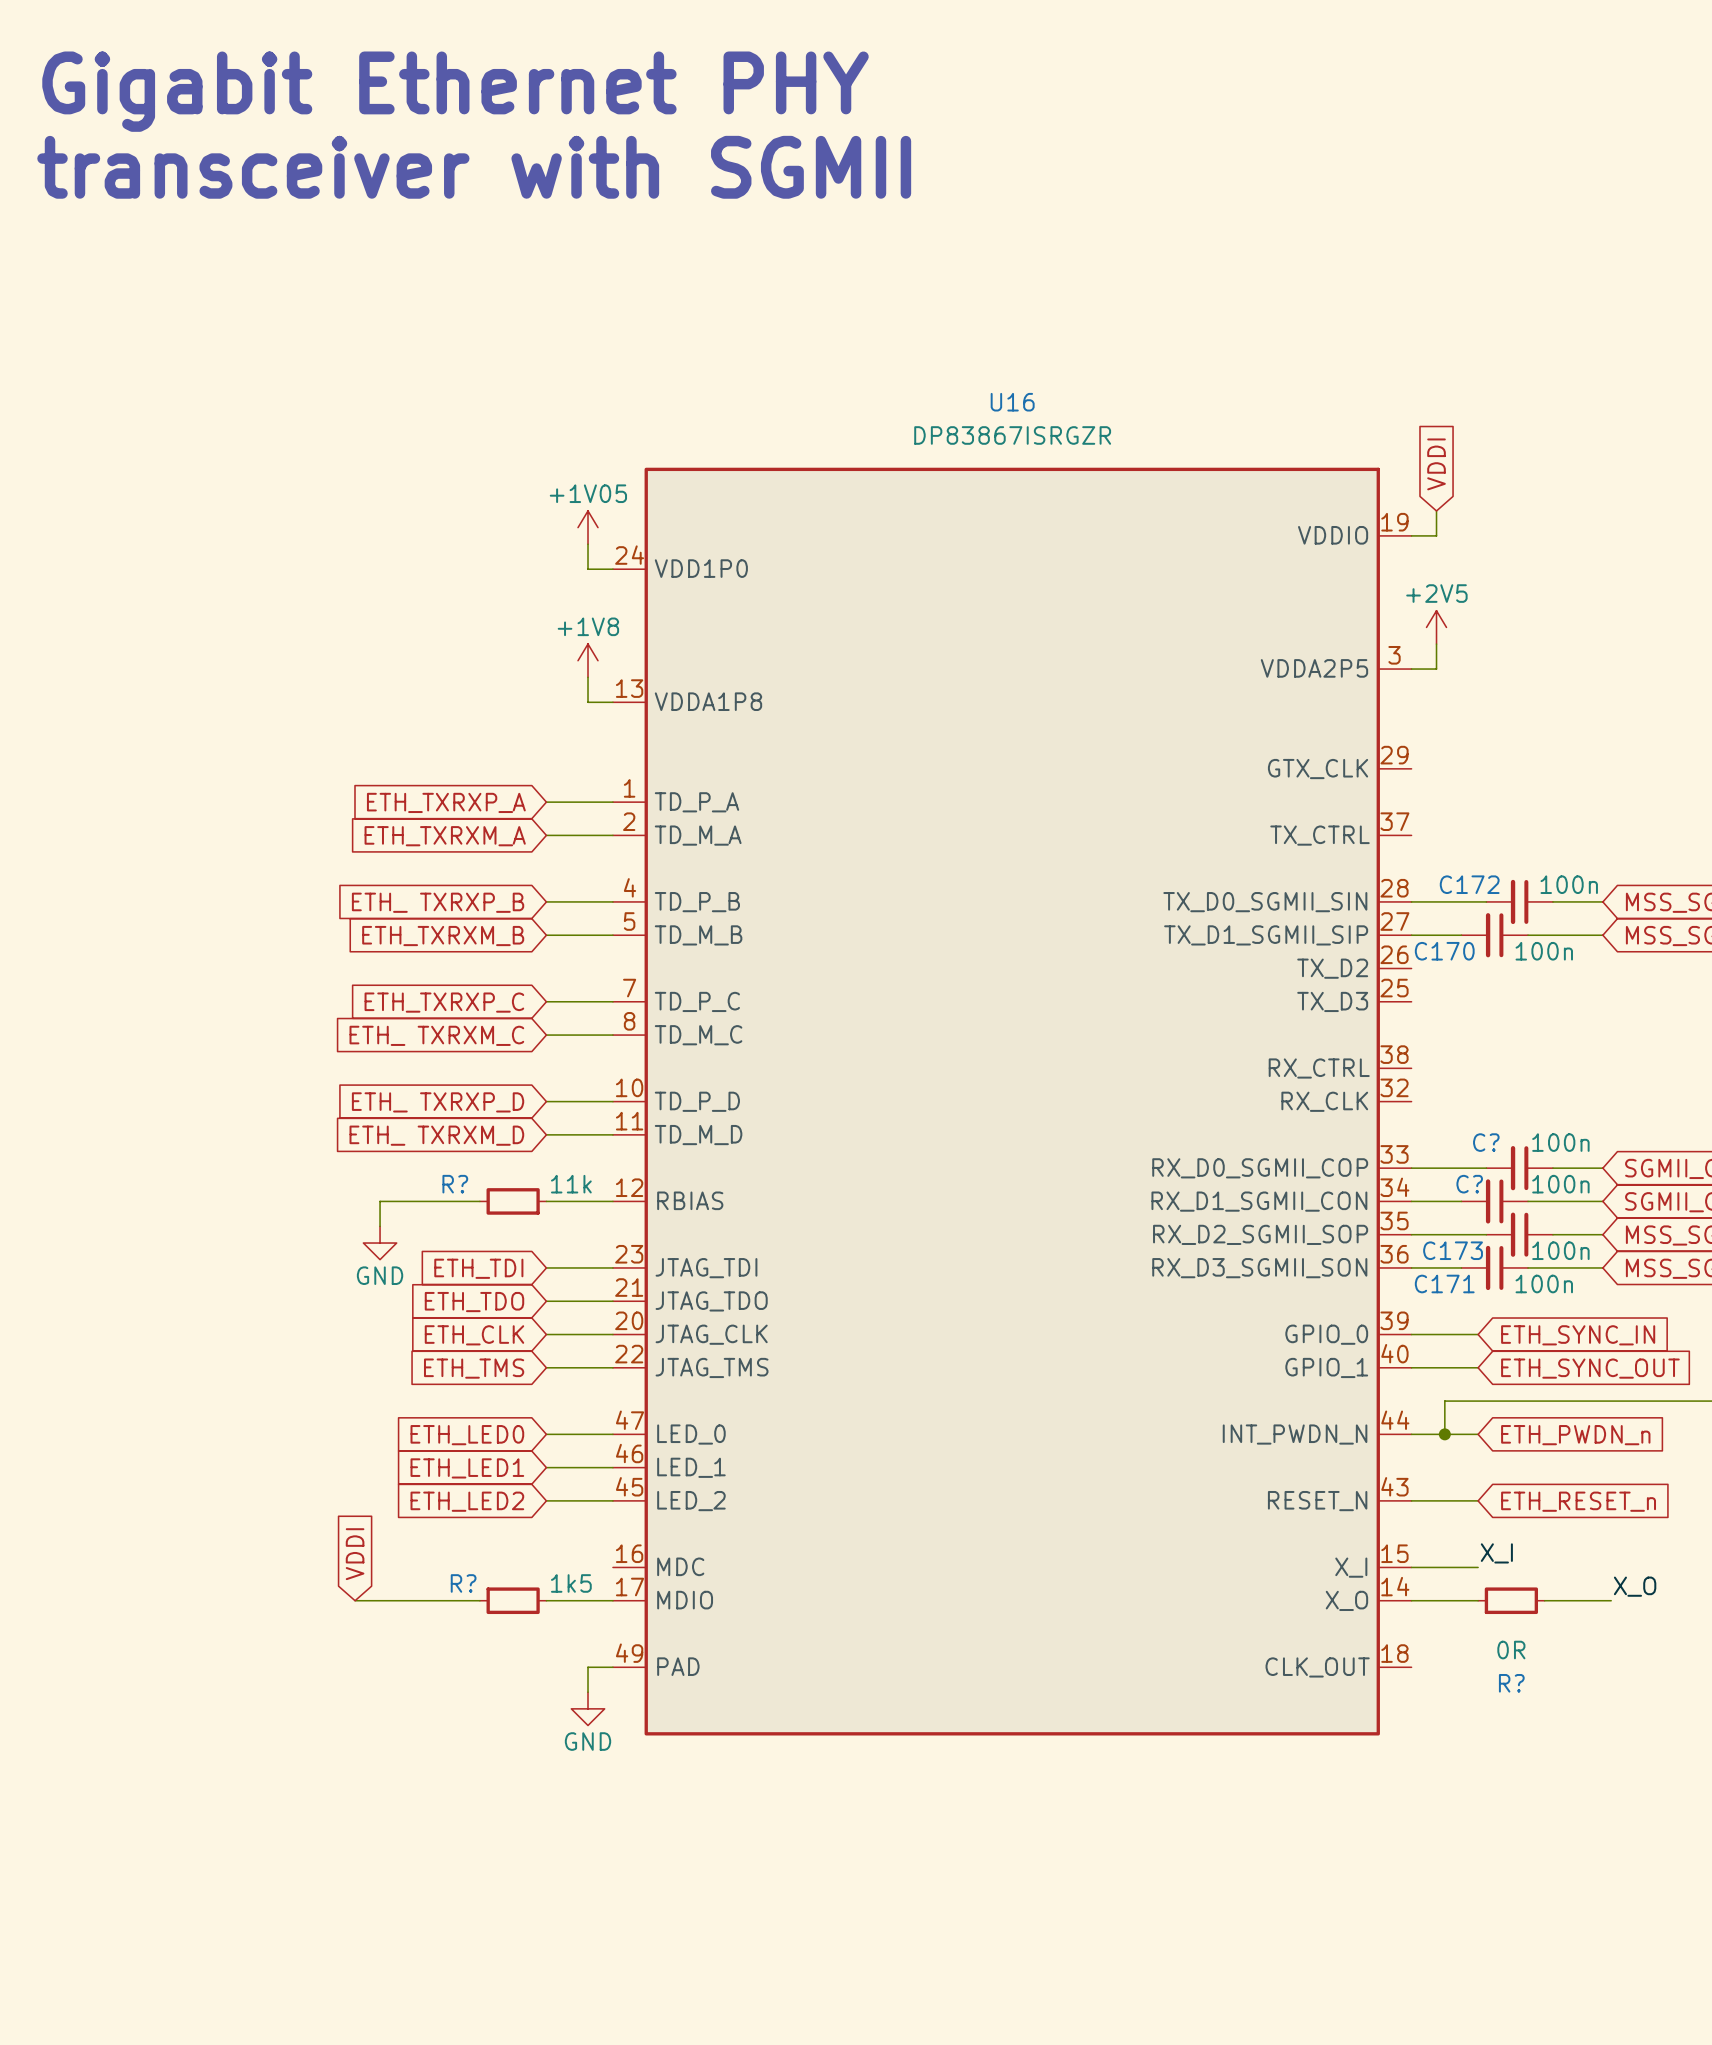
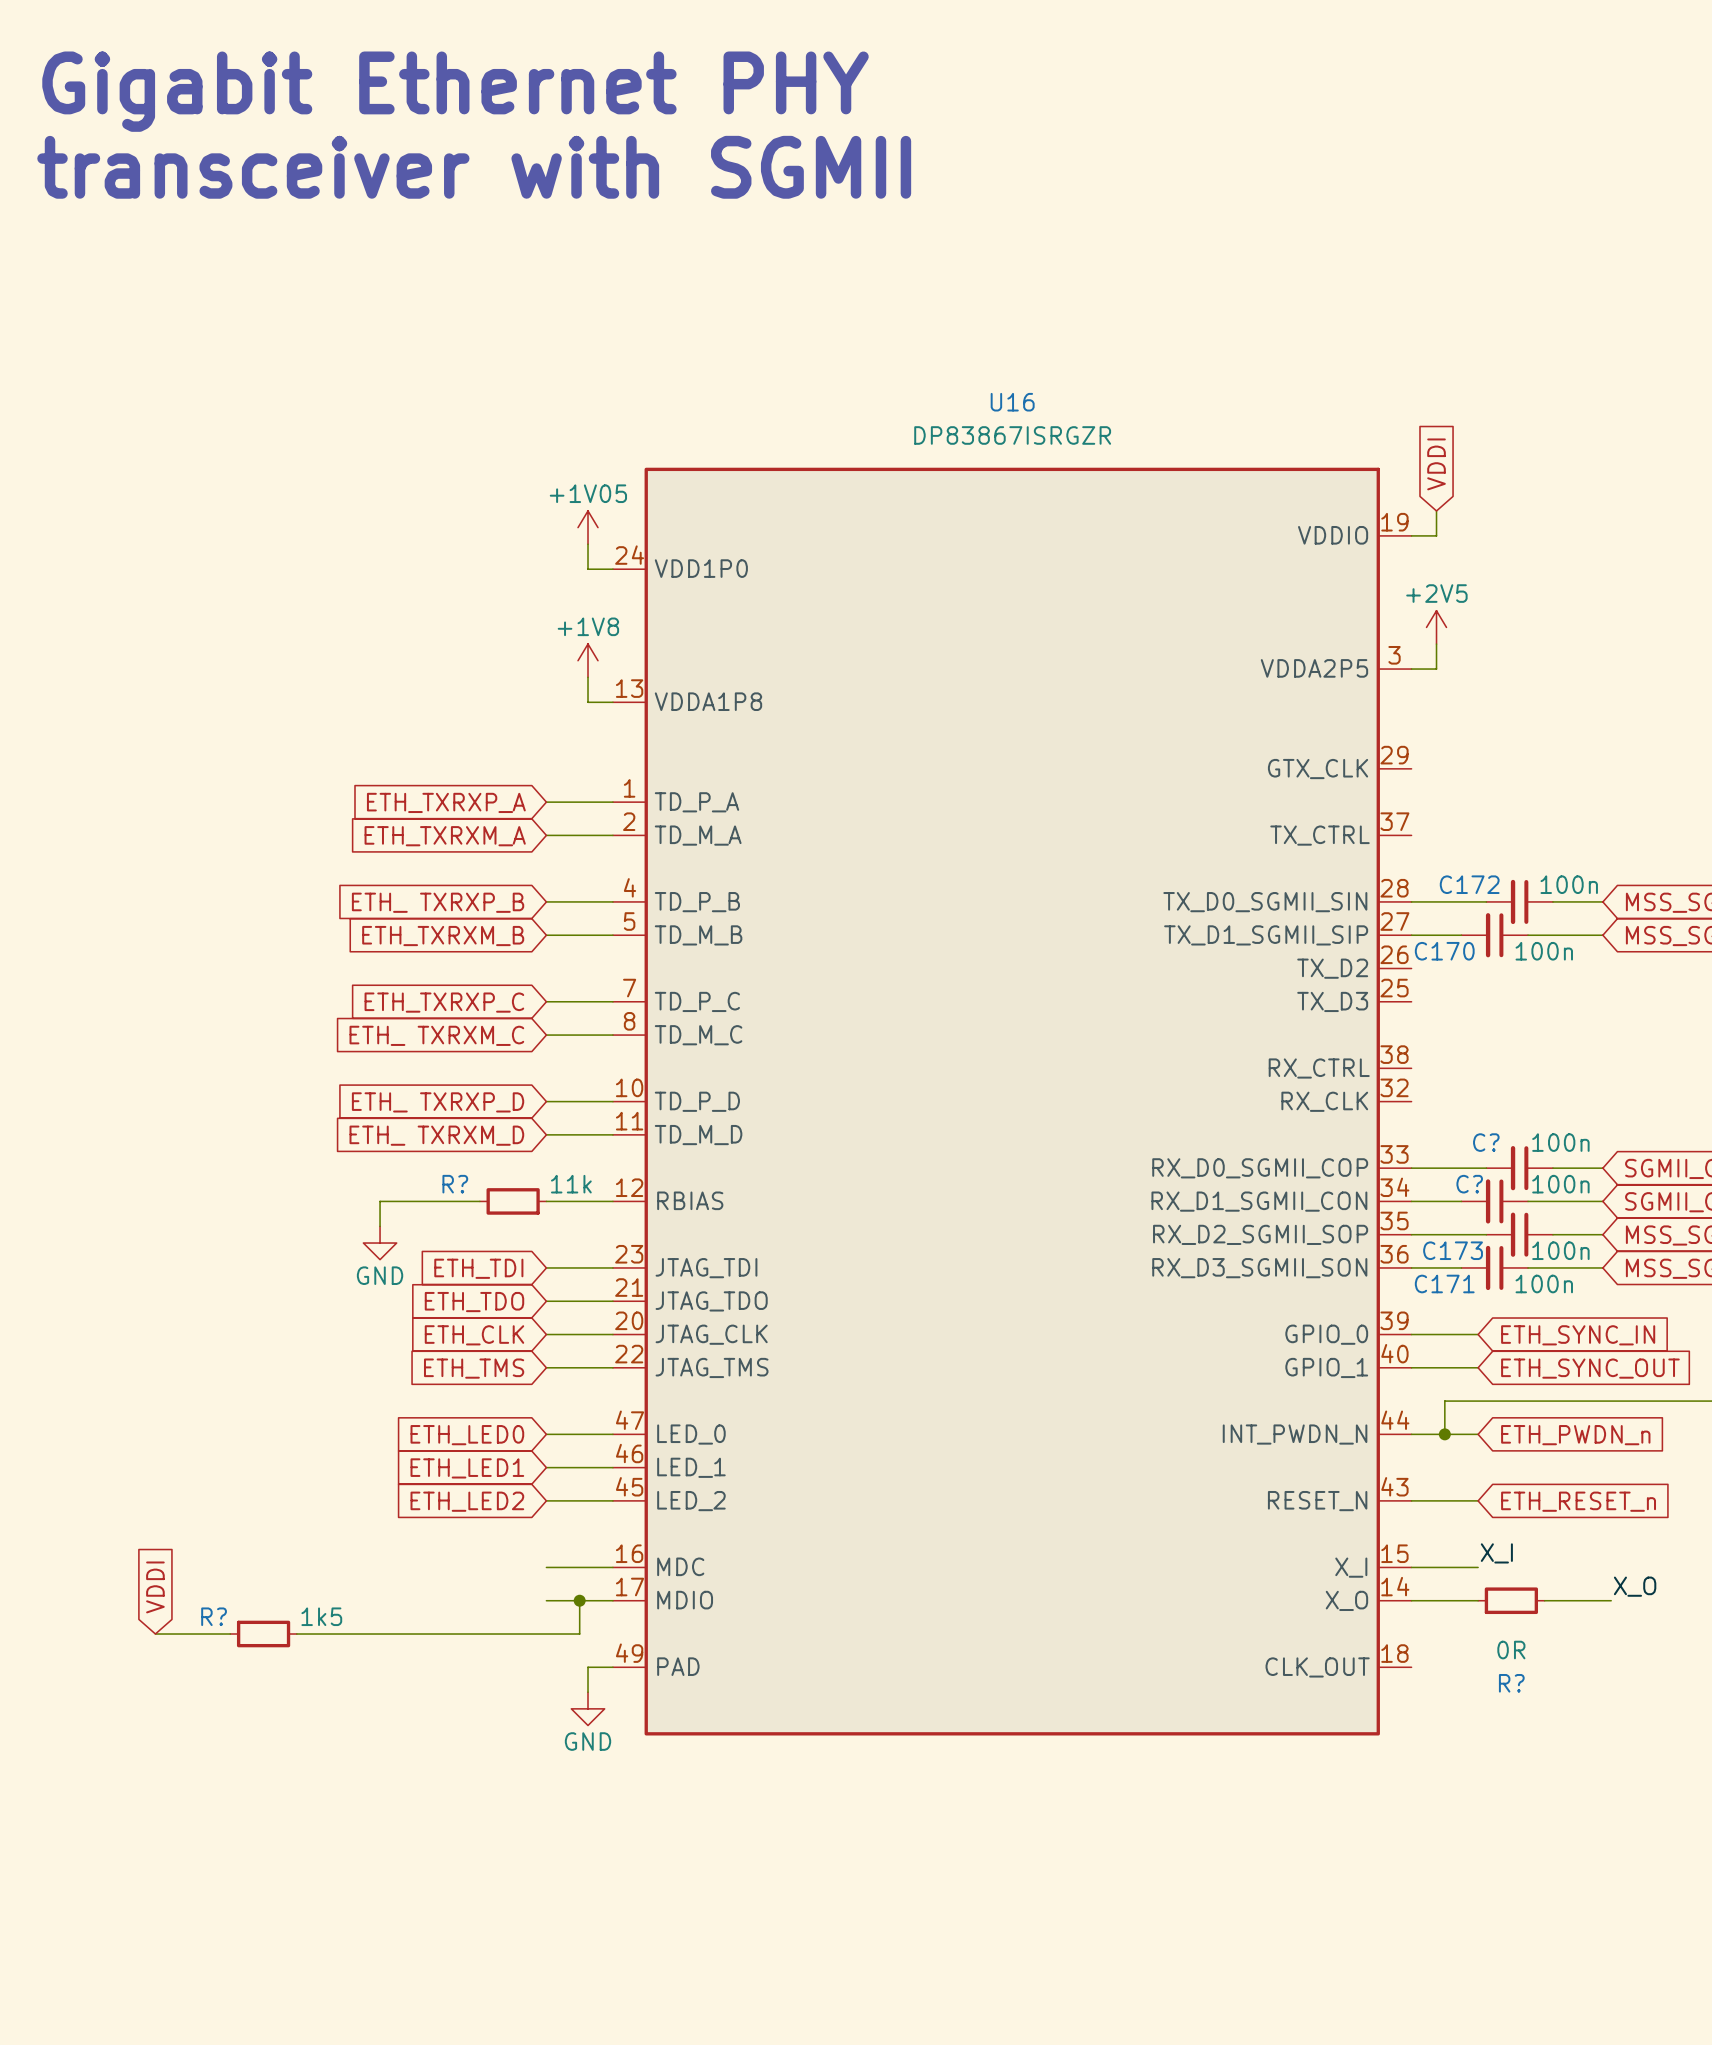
global label position: VDDI (355, 1554) -> VDDI (155, 1587)
wire: none -> (546, 1567) (612, 1567)
wire: (355, 1600) (479, 1600) -> none
R? position: (513, 1600) -> (263, 1634)
wire: none -> (579, 1600) (579, 1634) (296, 1634)
junction: none -> (579, 1600)
wire: none -> (155, 1634) (230, 1634)

